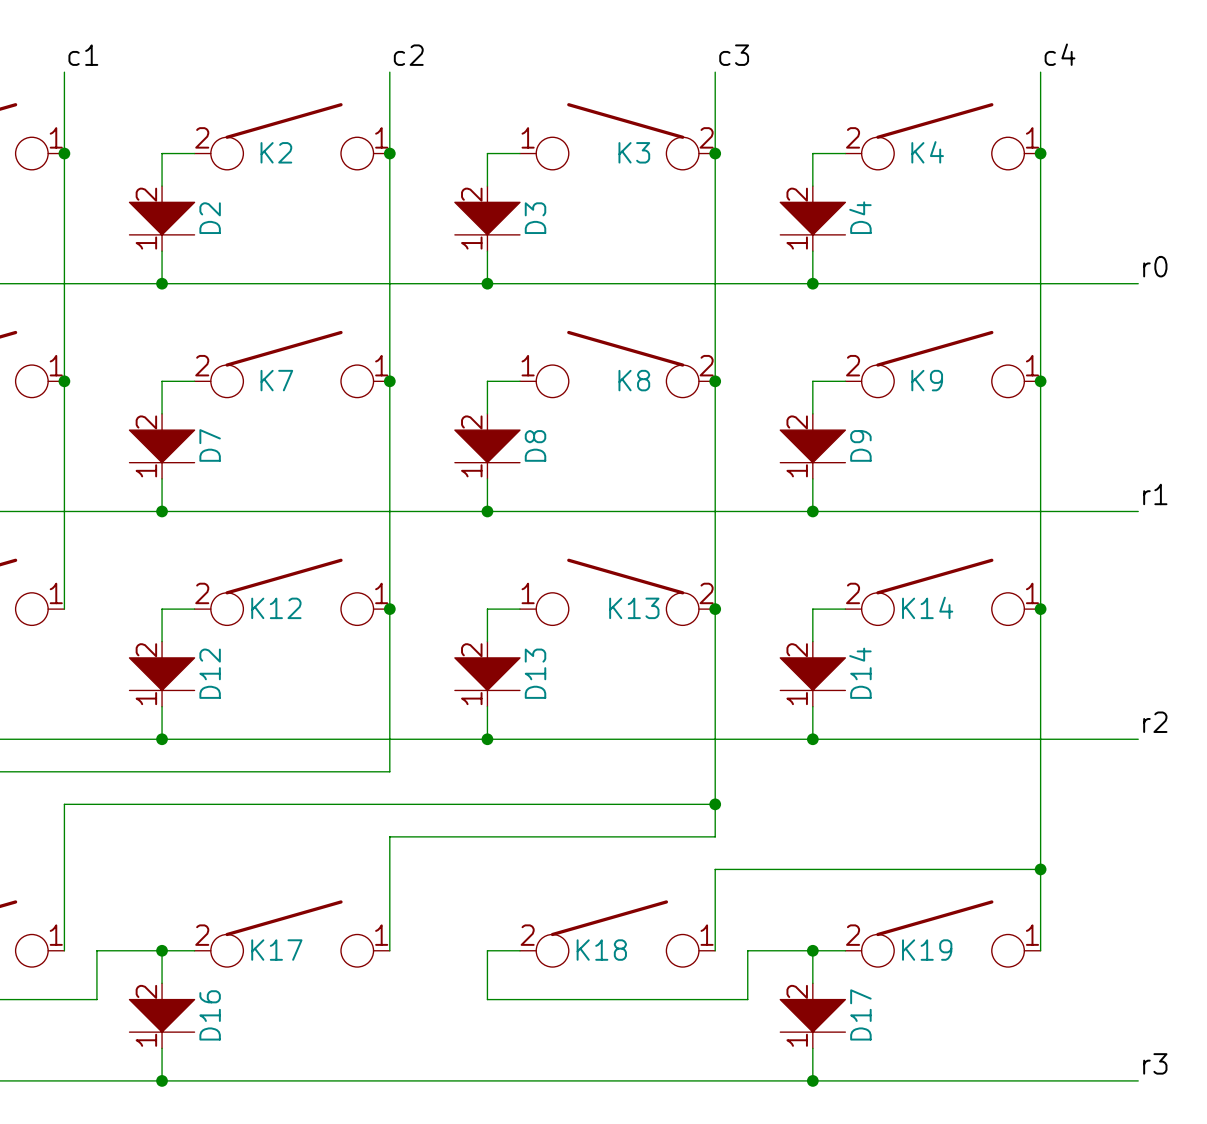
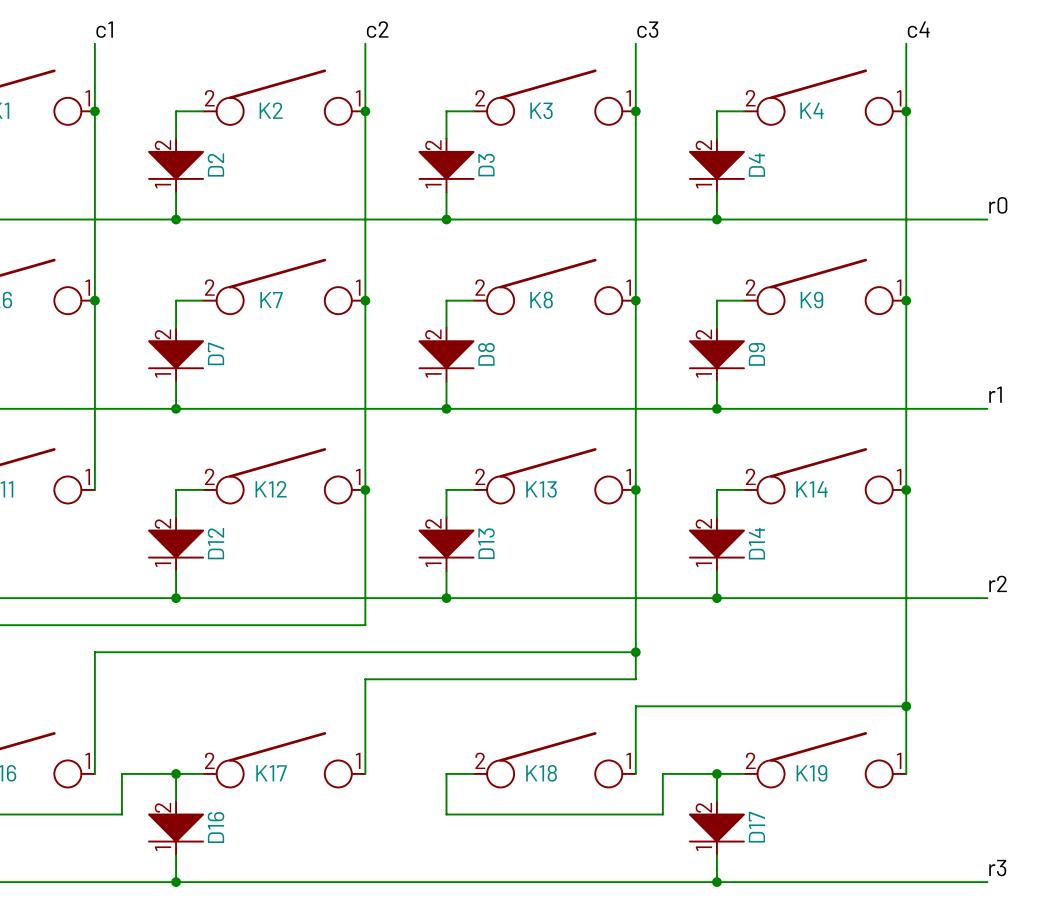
K3 flip: as is (617, 136) -> left-right (554, 97)
K8 flip: as is (617, 364) -> left-right (554, 286)
K13 flip: as is (617, 592) -> left-right (554, 475)

